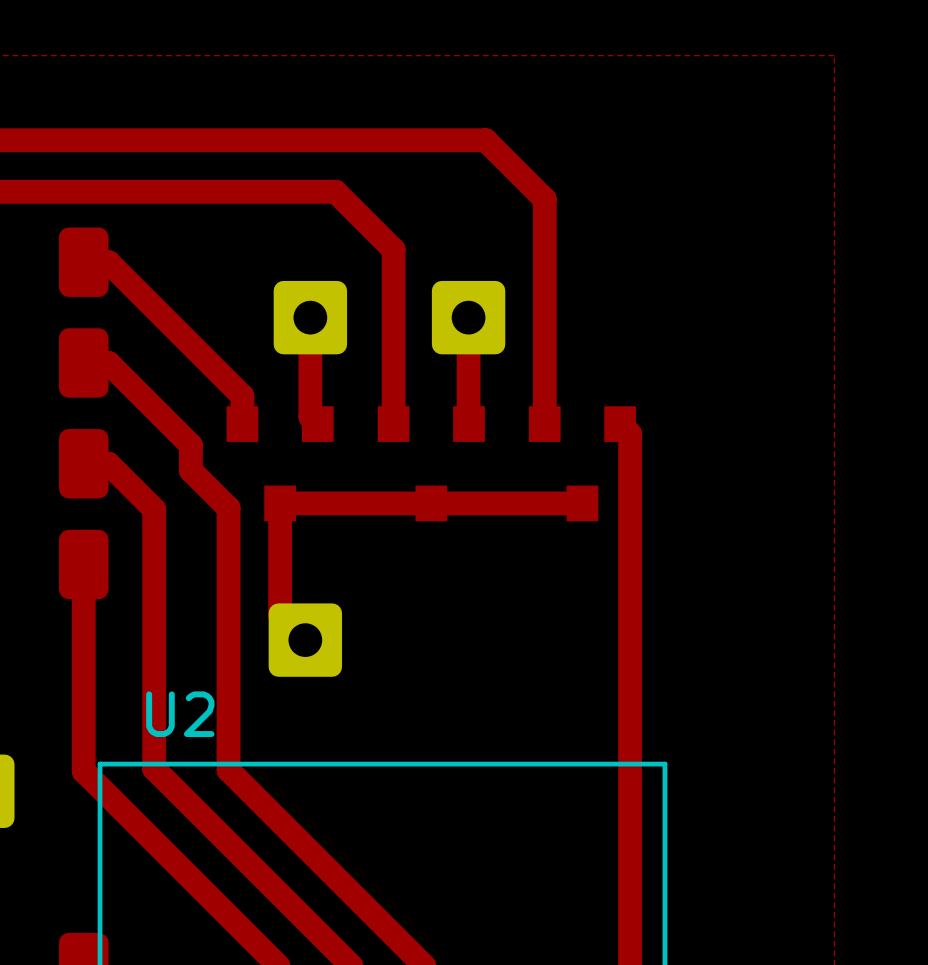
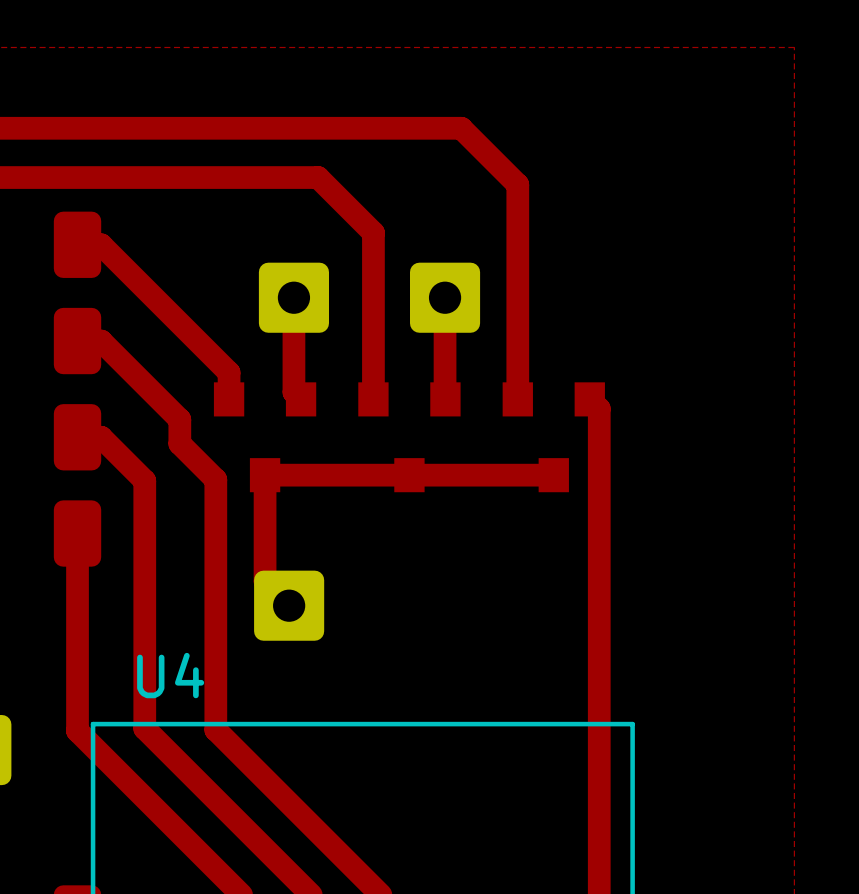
U2 name: U2 (180, 714) -> U4 (170, 675)

